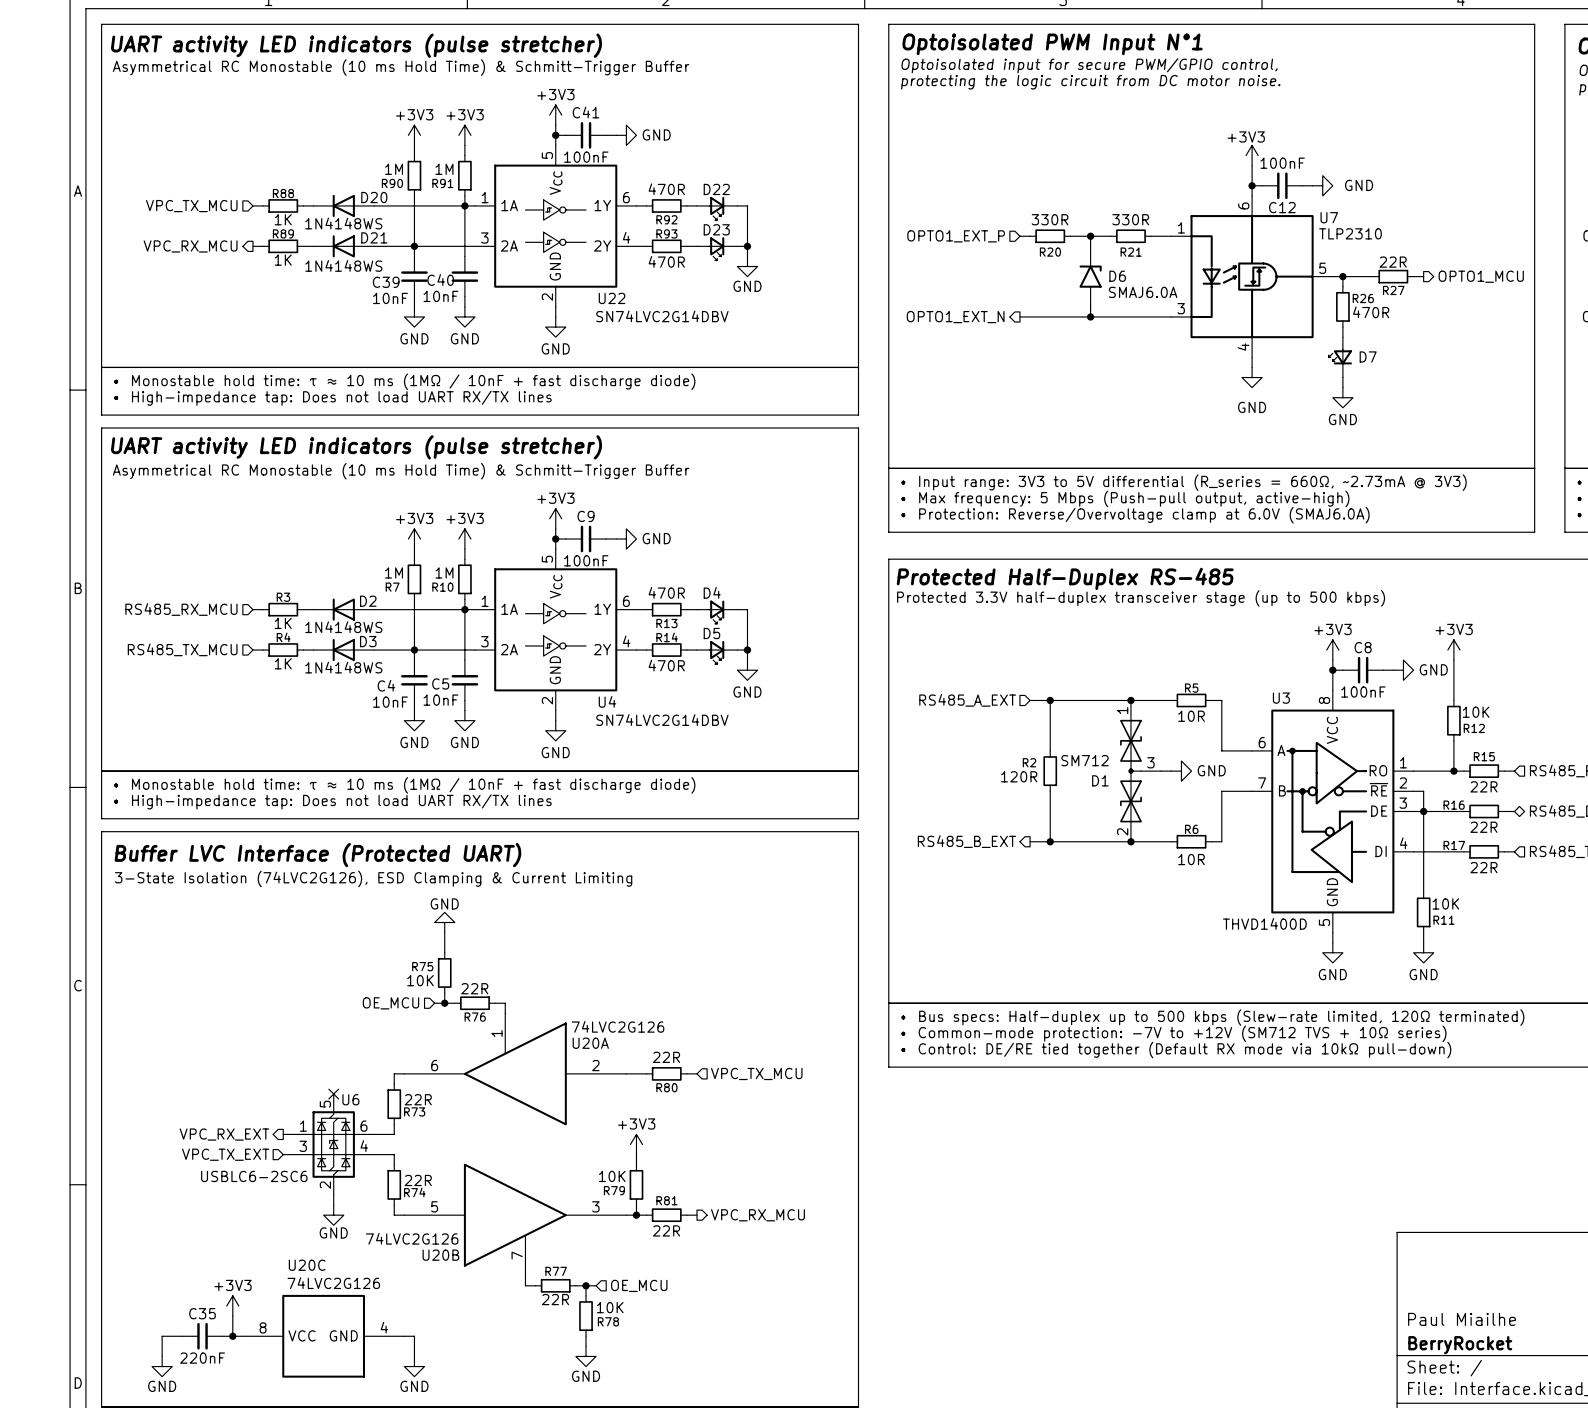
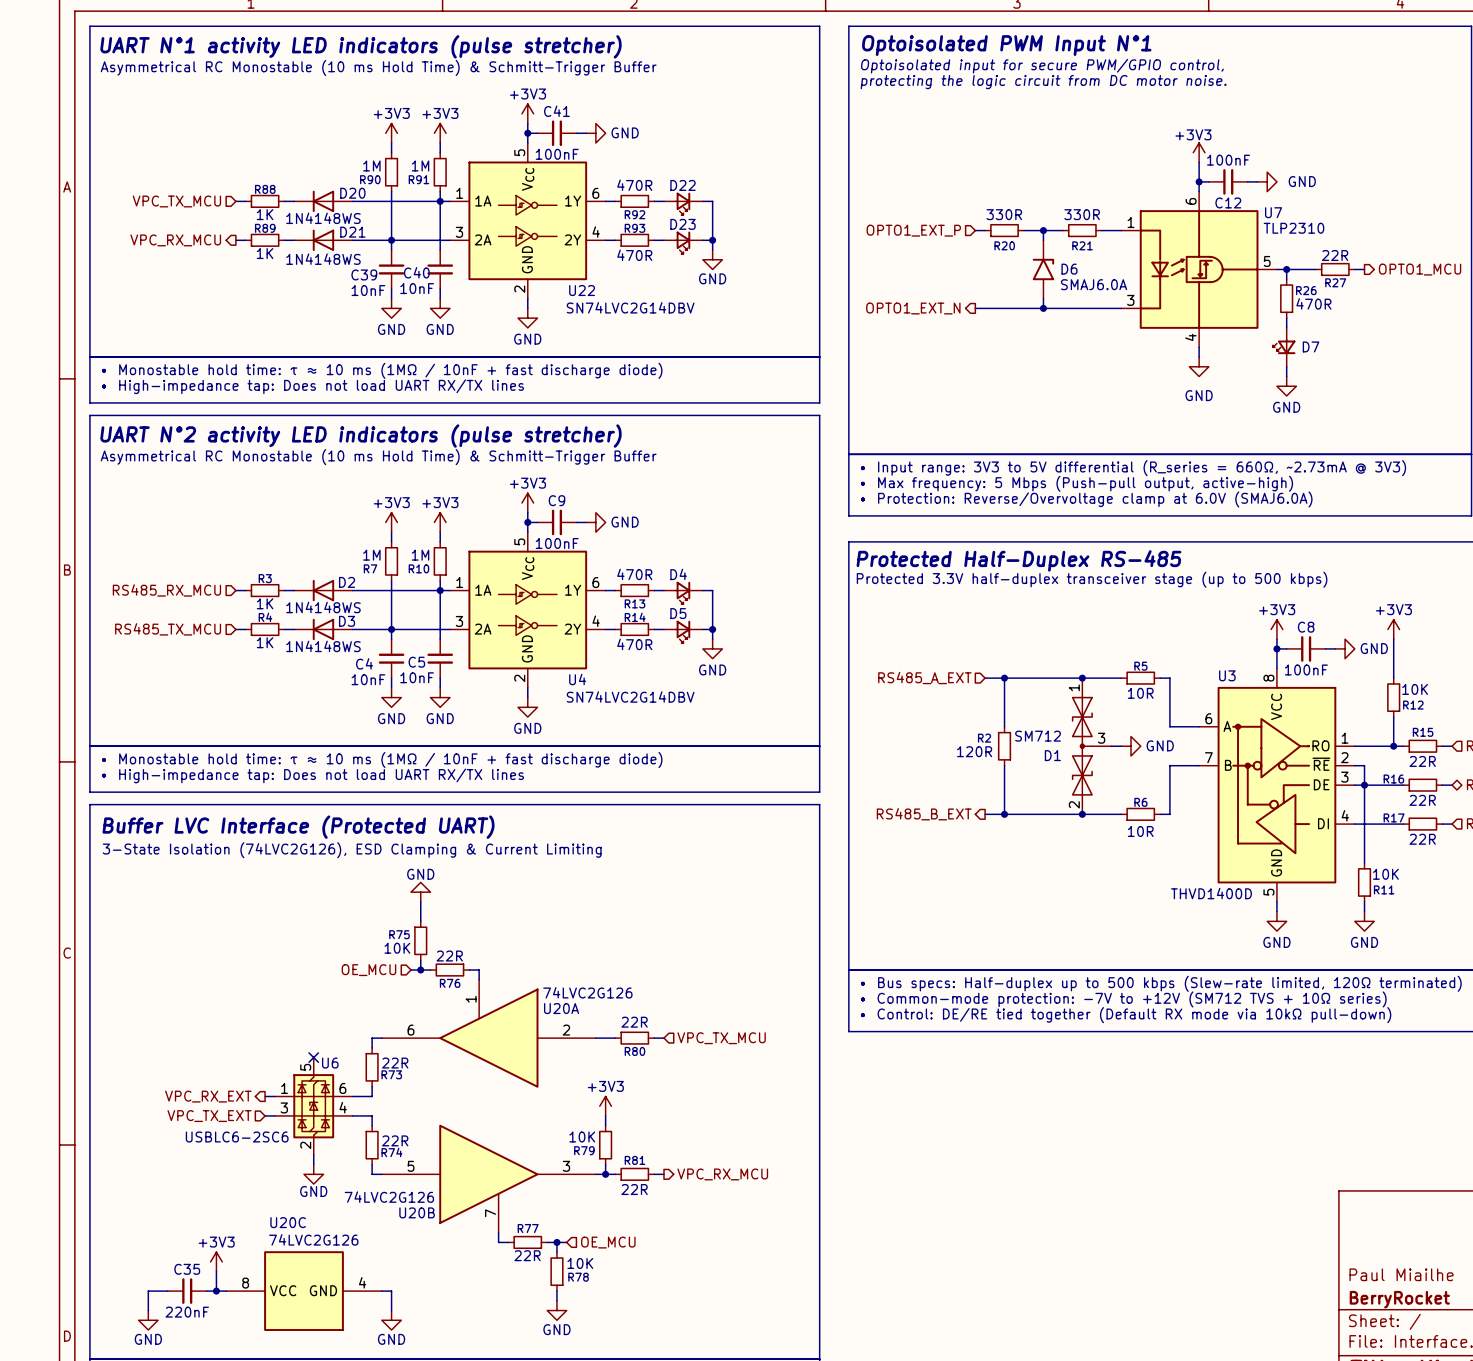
text: UART activity LED indicators (pulse stretcher) (356, 45) -> UART N°1 activity LED indicators (pulse stretcher) (360, 46)
text: UART activity LED indicators (pulse stretcher) (356, 447) -> UART N°2 activity LED indicators (pulse stretcher) (360, 436)

